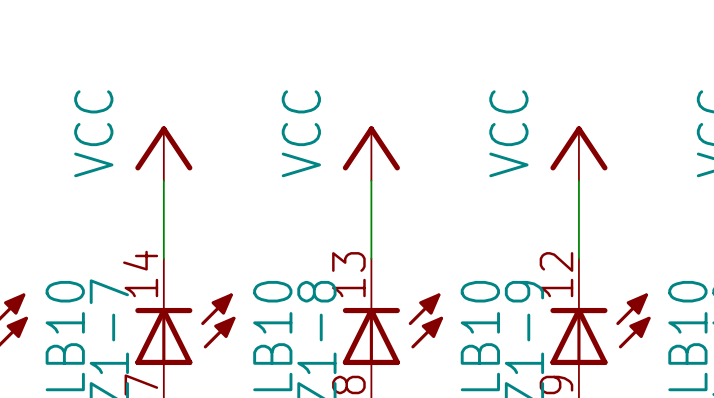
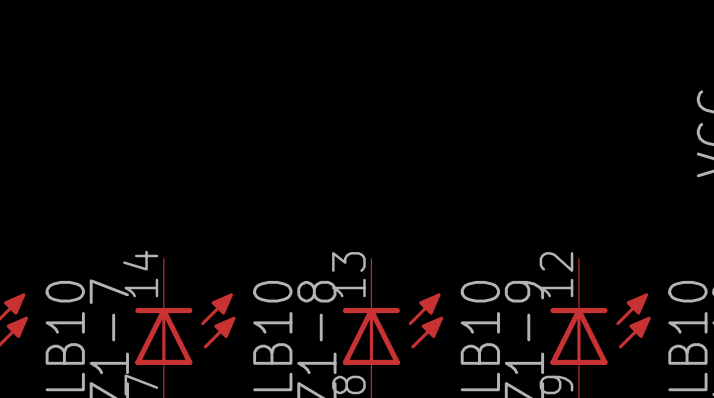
power symbol: VCC (163, 153) -> none
power symbol: VCC (371, 153) -> none
power symbol: VCC (578, 153) -> none
wire: (163, 180) (163, 258) -> none
wire: (371, 180) (371, 258) -> none
wire: (578, 180) (578, 258) -> none

